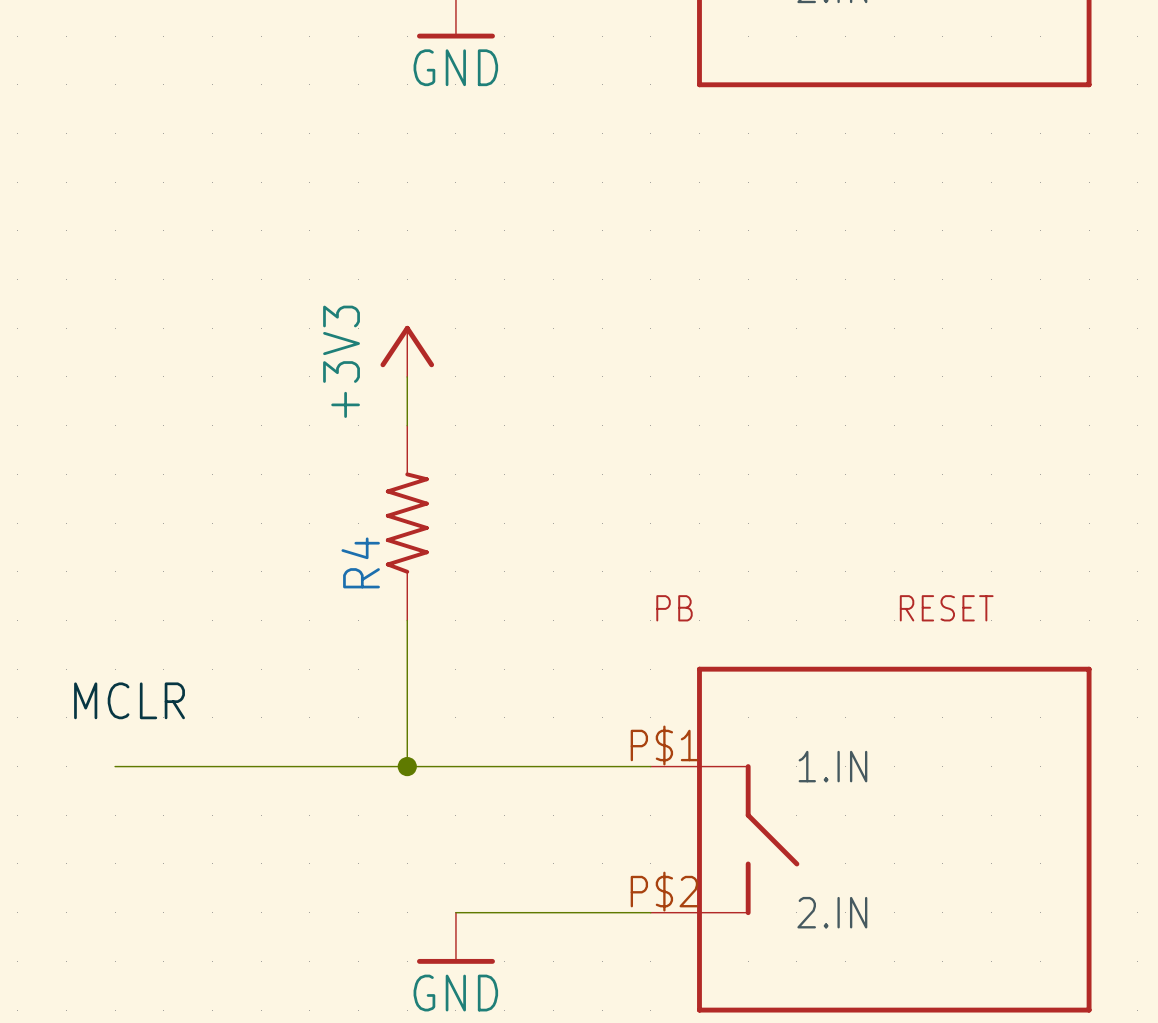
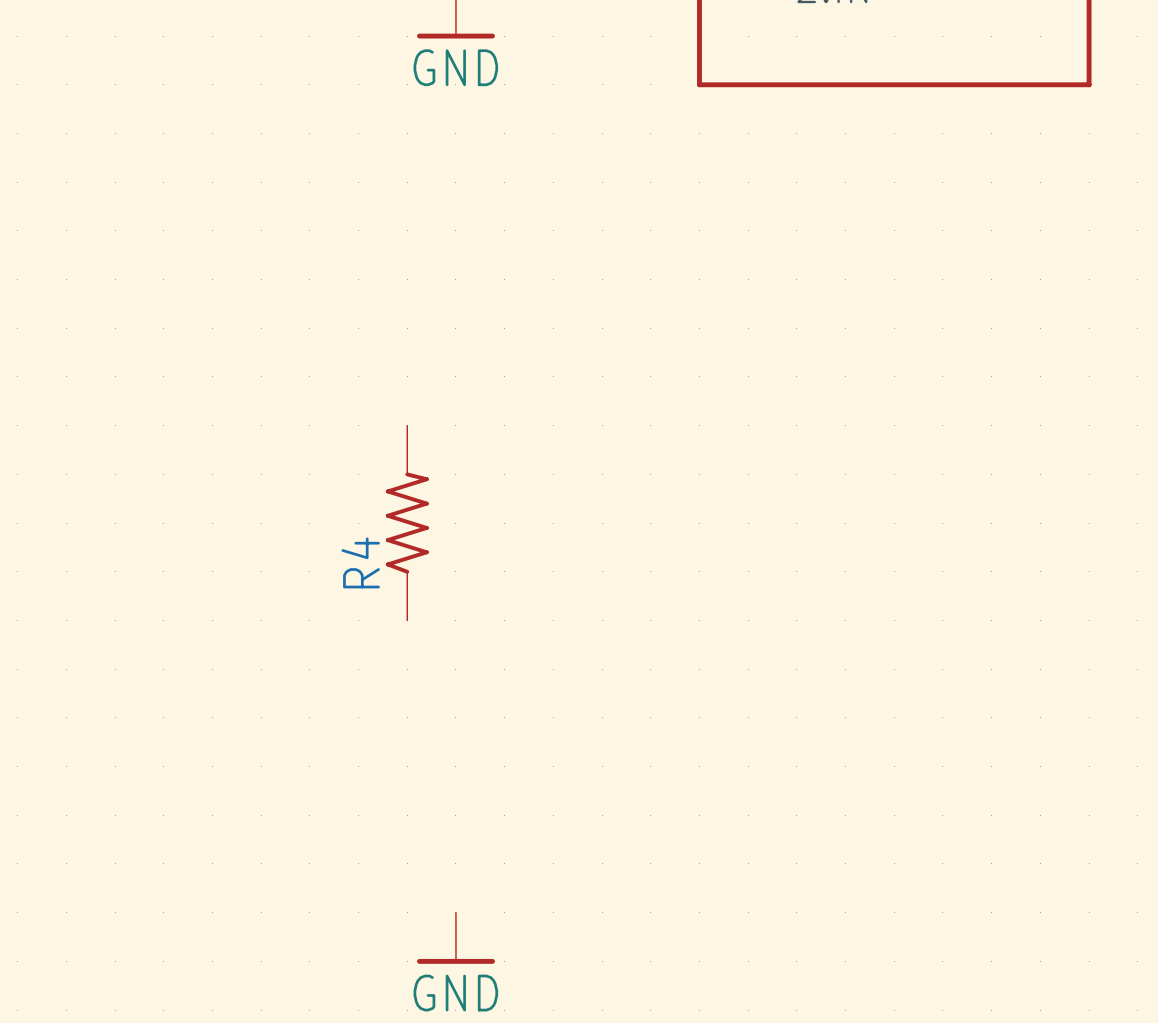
power symbol: +3V3 (407, 351) -> none
wire: (407, 376) (407, 425) -> none
wire: (407, 620) (407, 766) -> none
label: MCLR (129, 700) -> none
wire: (115, 766) (650, 766) -> none
junction: (407, 766) -> none
RESET: PB (871, 839) -> none
wire: (455, 912) (650, 912) -> none

